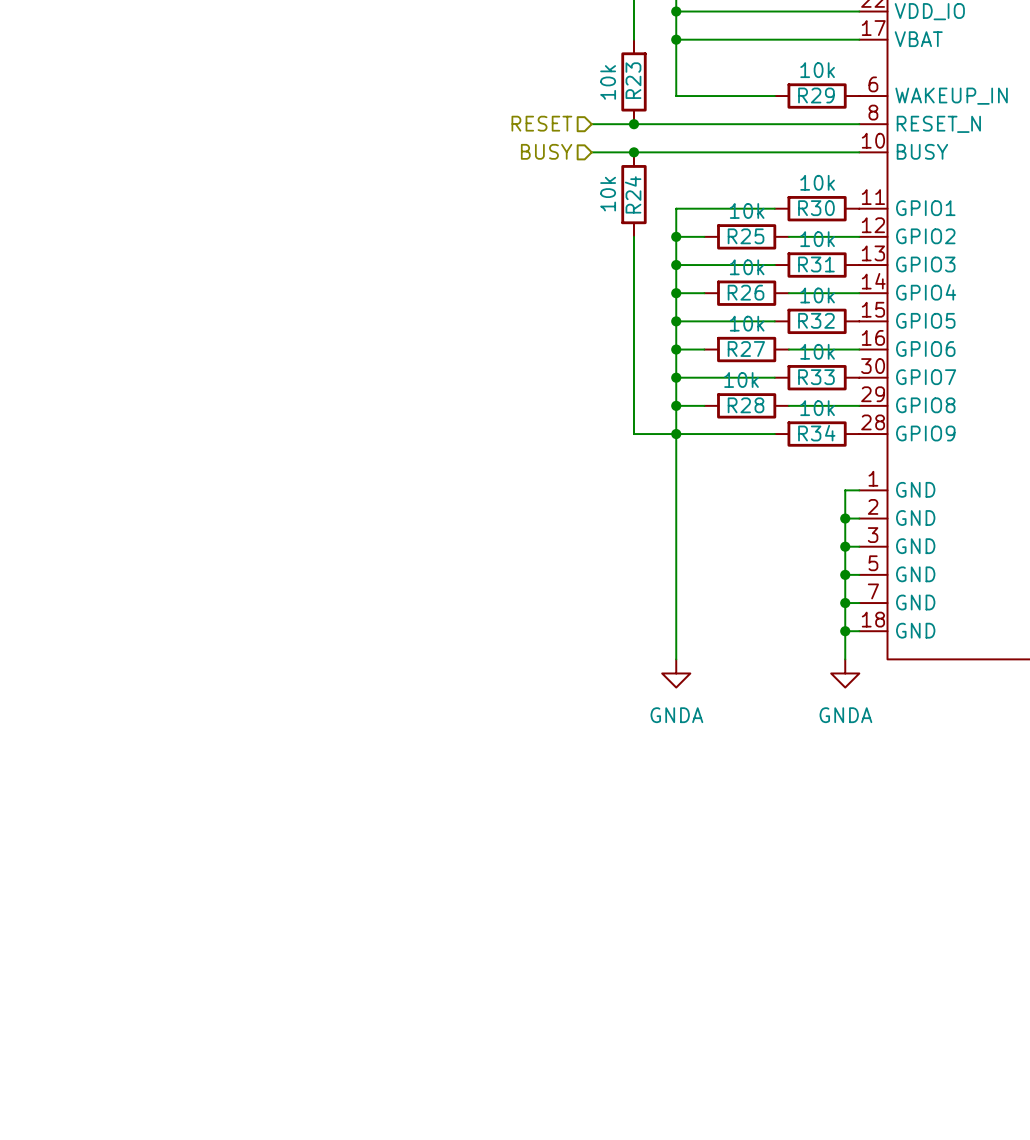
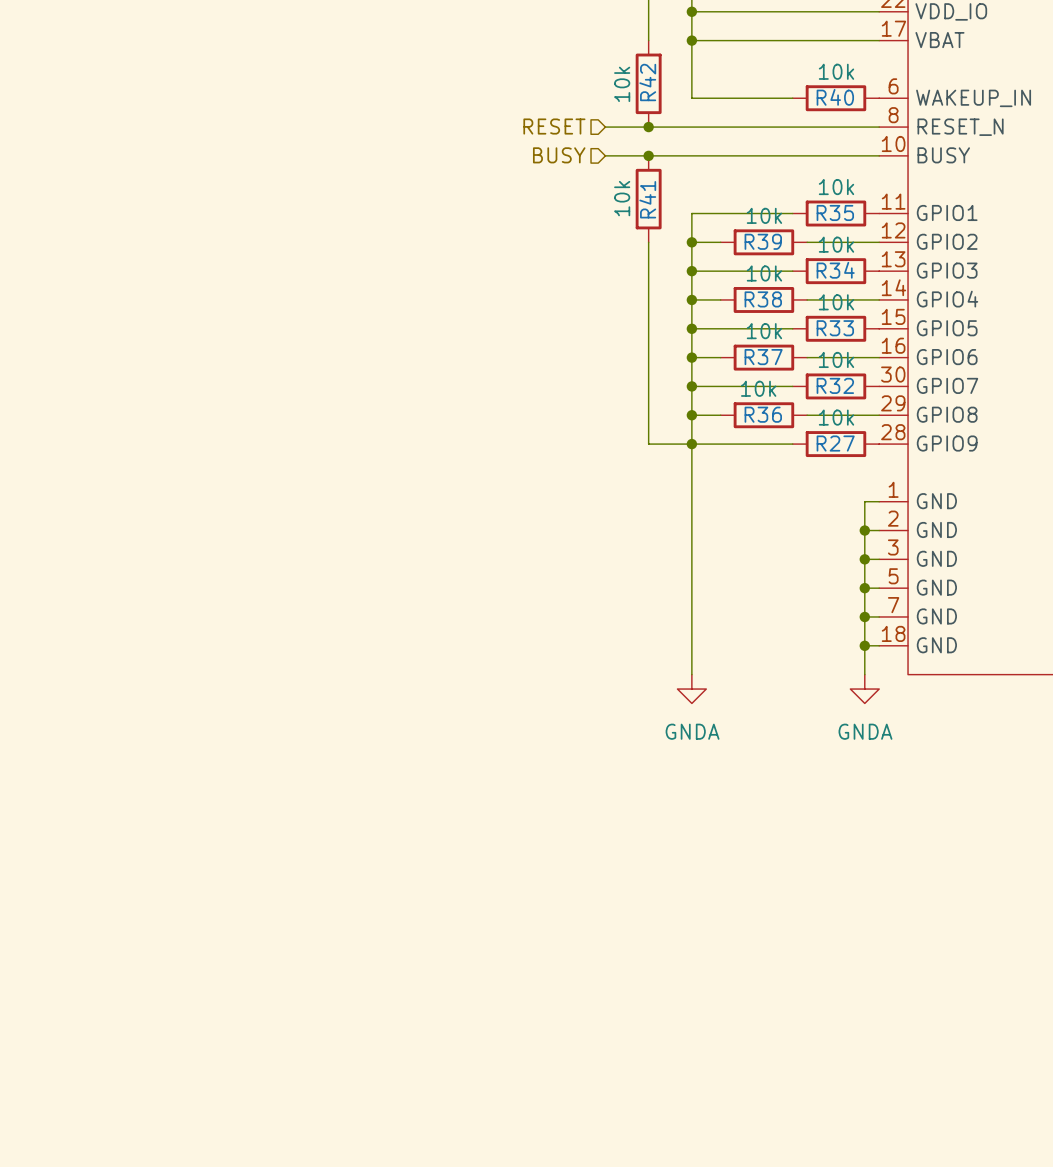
R23 name: R23 (633, 80) -> R42 (647, 82)
R29 name: R29 (816, 95) -> R40 (835, 97)
R24 name: R24 (633, 194) -> R41 (647, 199)
R30 name: R30 (816, 208) -> R35 (835, 212)
R25 name: R25 (746, 236) -> R39 (763, 241)
R31 name: R31 (816, 264) -> R34 (835, 270)
R26 name: R26 (746, 292) -> R38 (763, 299)
R32 name: R32 (816, 320) -> R33 (835, 328)
R27 name: R27 (746, 349) -> R37 (763, 357)
R33 name: R33 (816, 377) -> R32 (835, 385)
R28 name: R28 (746, 405) -> R36 (763, 414)
R34 name: R34 (816, 433) -> R27 (835, 443)

